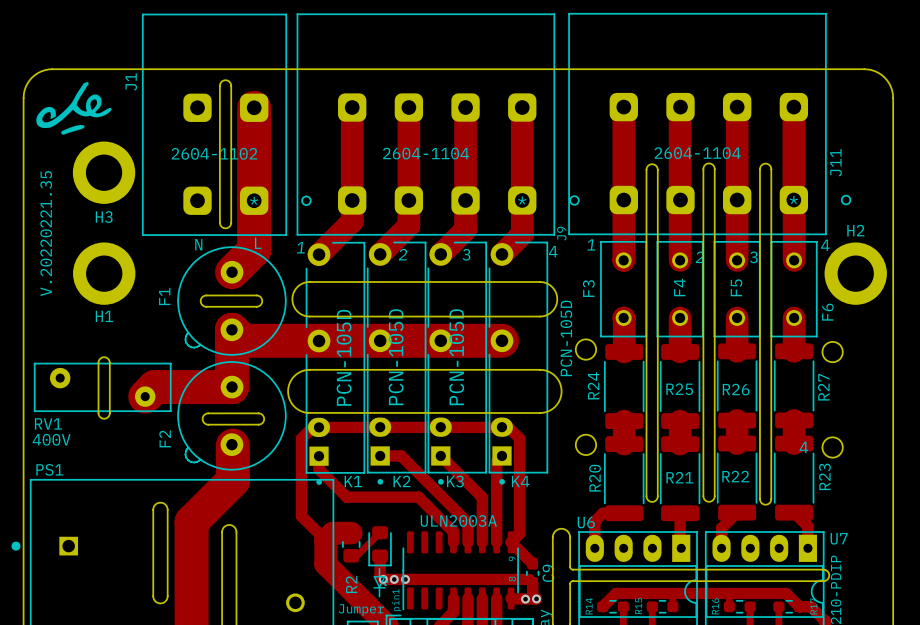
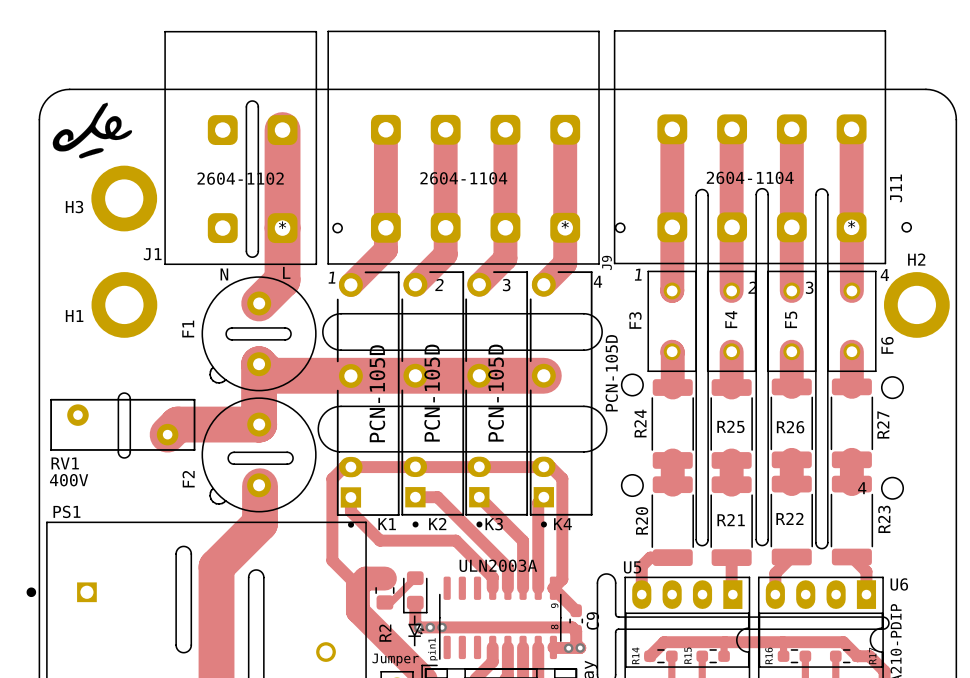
J1 name rotation: 0° (131, 81) -> 90° clockwise (152, 254)
J1 name position: J1 (131, 81) -> J1 (152, 254)
H3 name position: H3 (104, 217) -> H3 (74, 207)
text: V.20220221.35 (46, 233) -> none
H1 name position: H1 (104, 316) -> H1 (74, 316)
U6 name: U6 (586, 522) -> U5 (632, 567)
U7 name: U7 (839, 538) -> U6 (899, 584)

